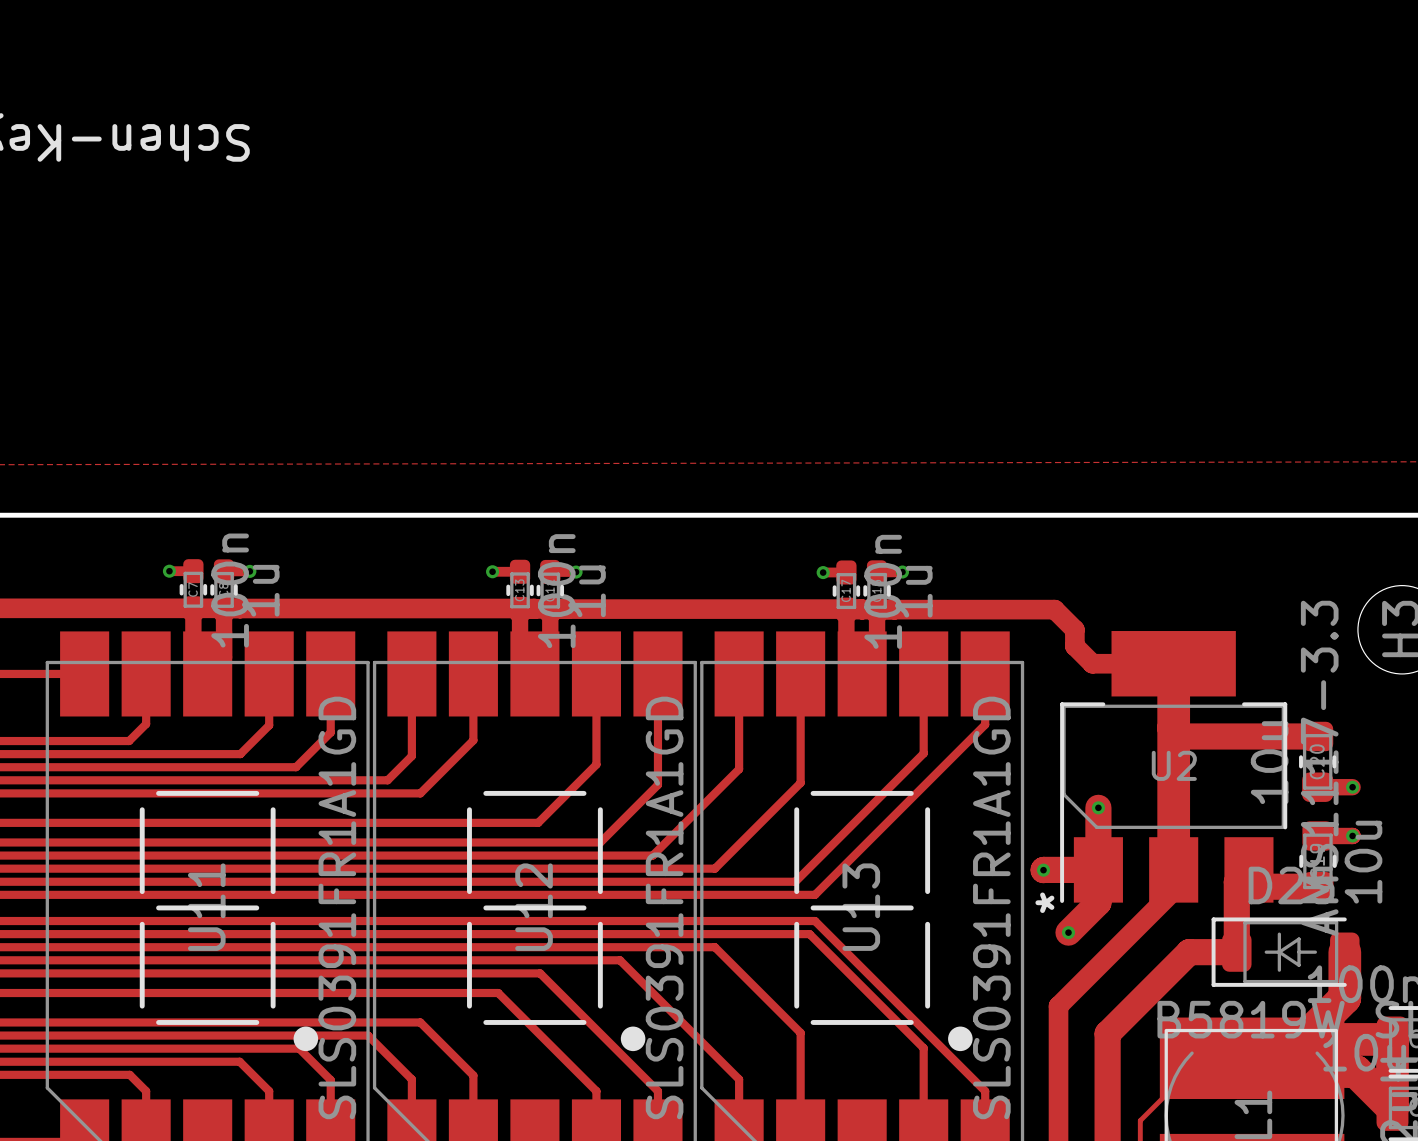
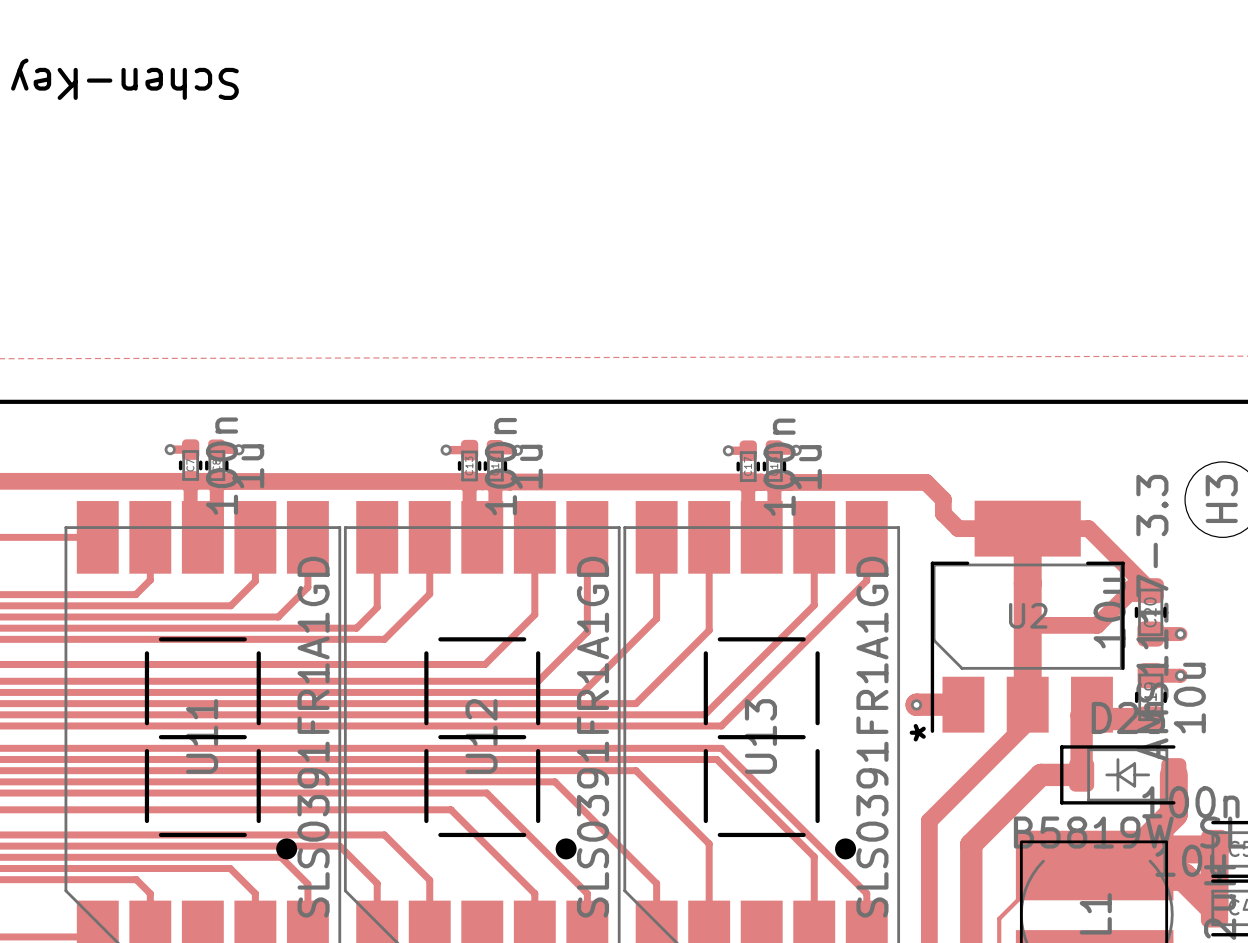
track: none -> (1027, 528) (1088, 528) (1150, 590)
track: (1173, 727) (1182, 736) (1295, 736) -> (1027, 625) (1097, 625) (1131, 590)
track: (1098, 807) (1098, 902) (1068, 932) -> none
via: (1098, 807) -> none
via: (1068, 932) -> none

